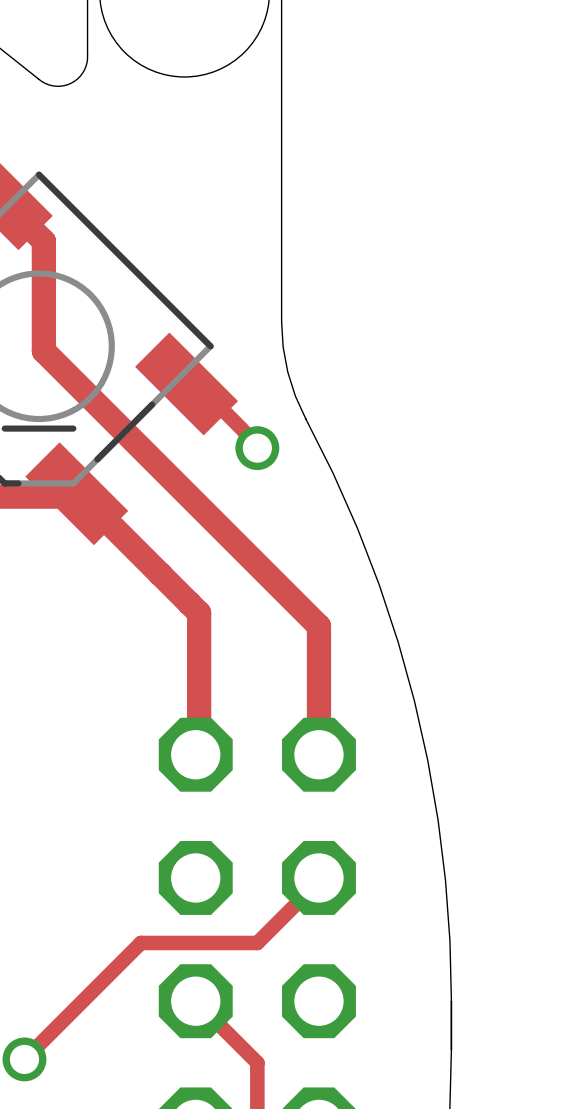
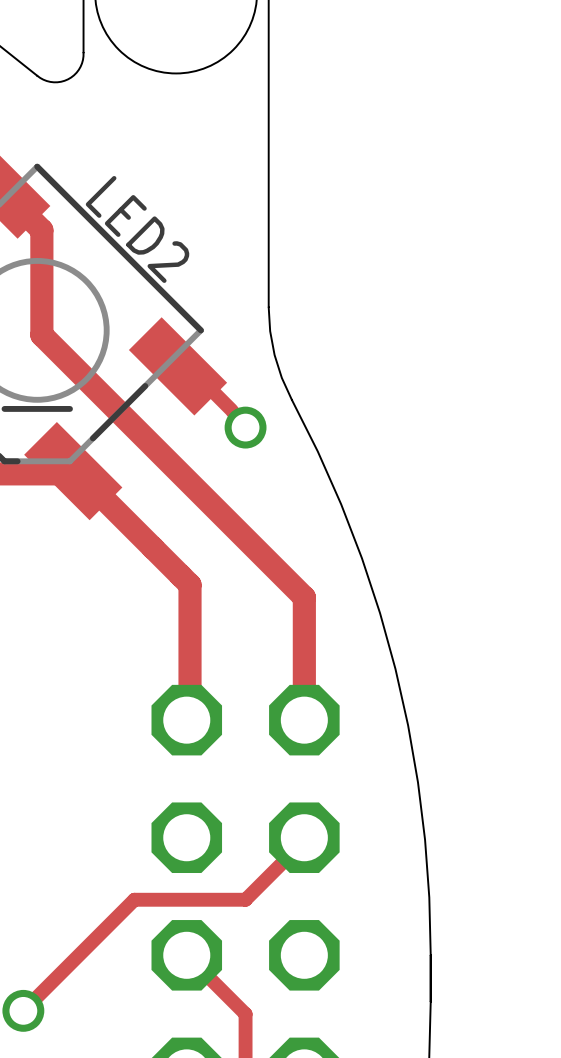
LED2 name: none -> LED2 (137, 229)

